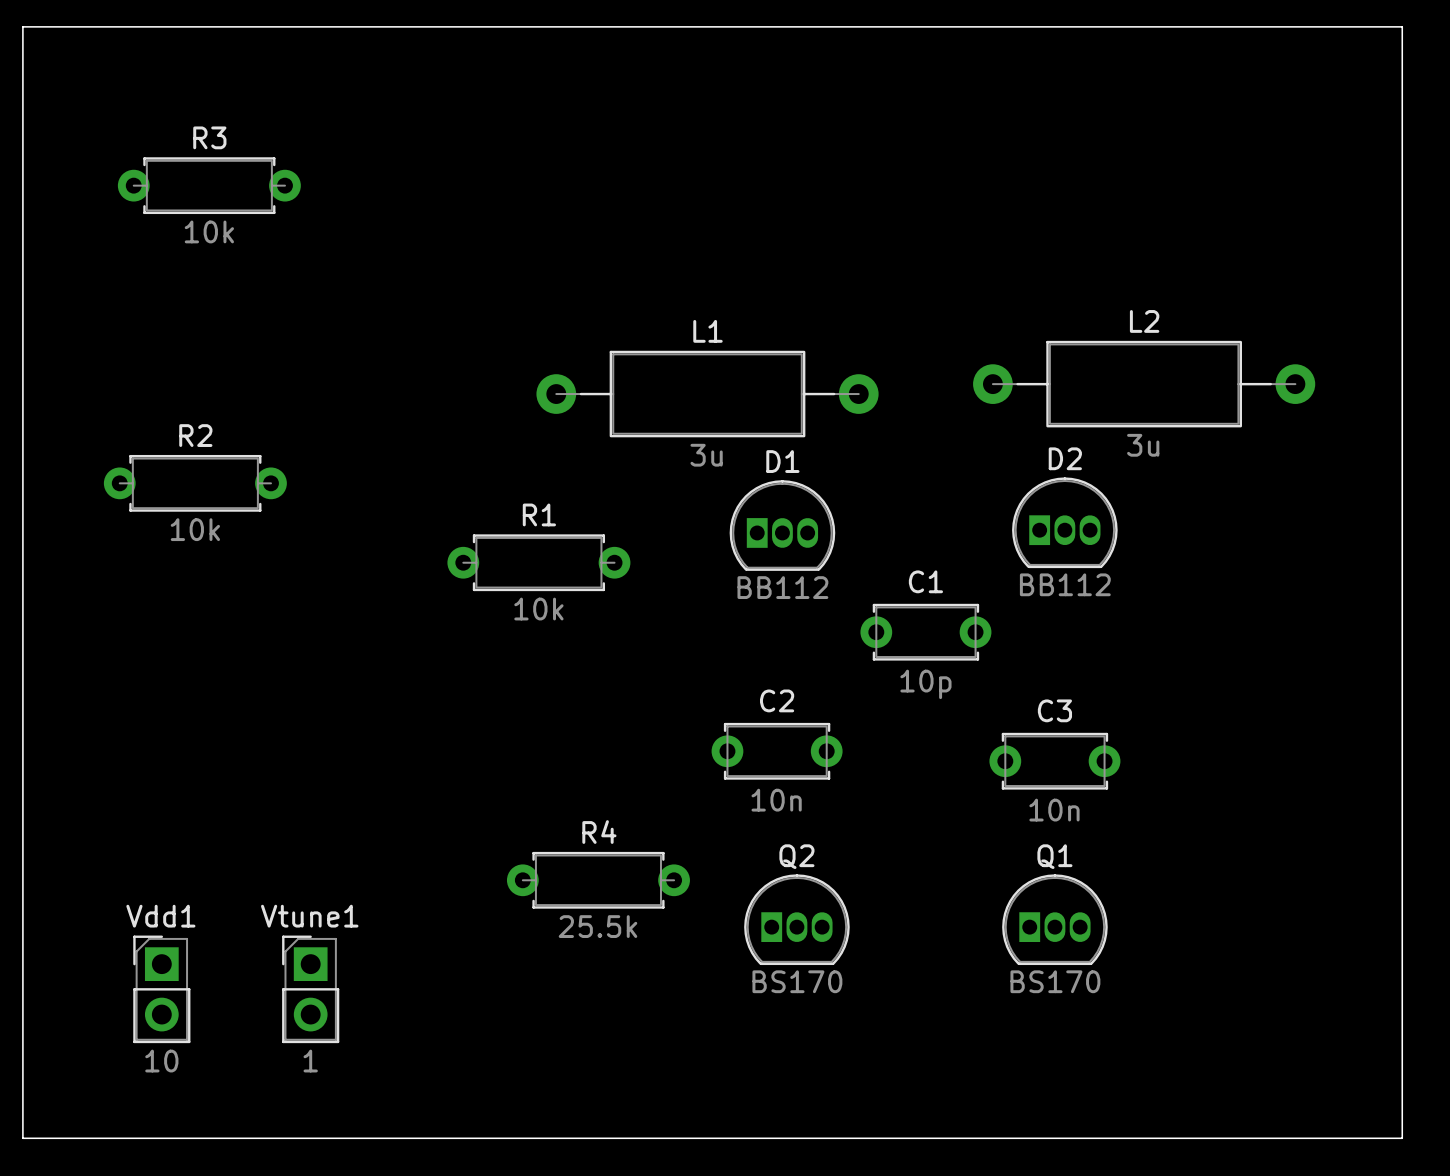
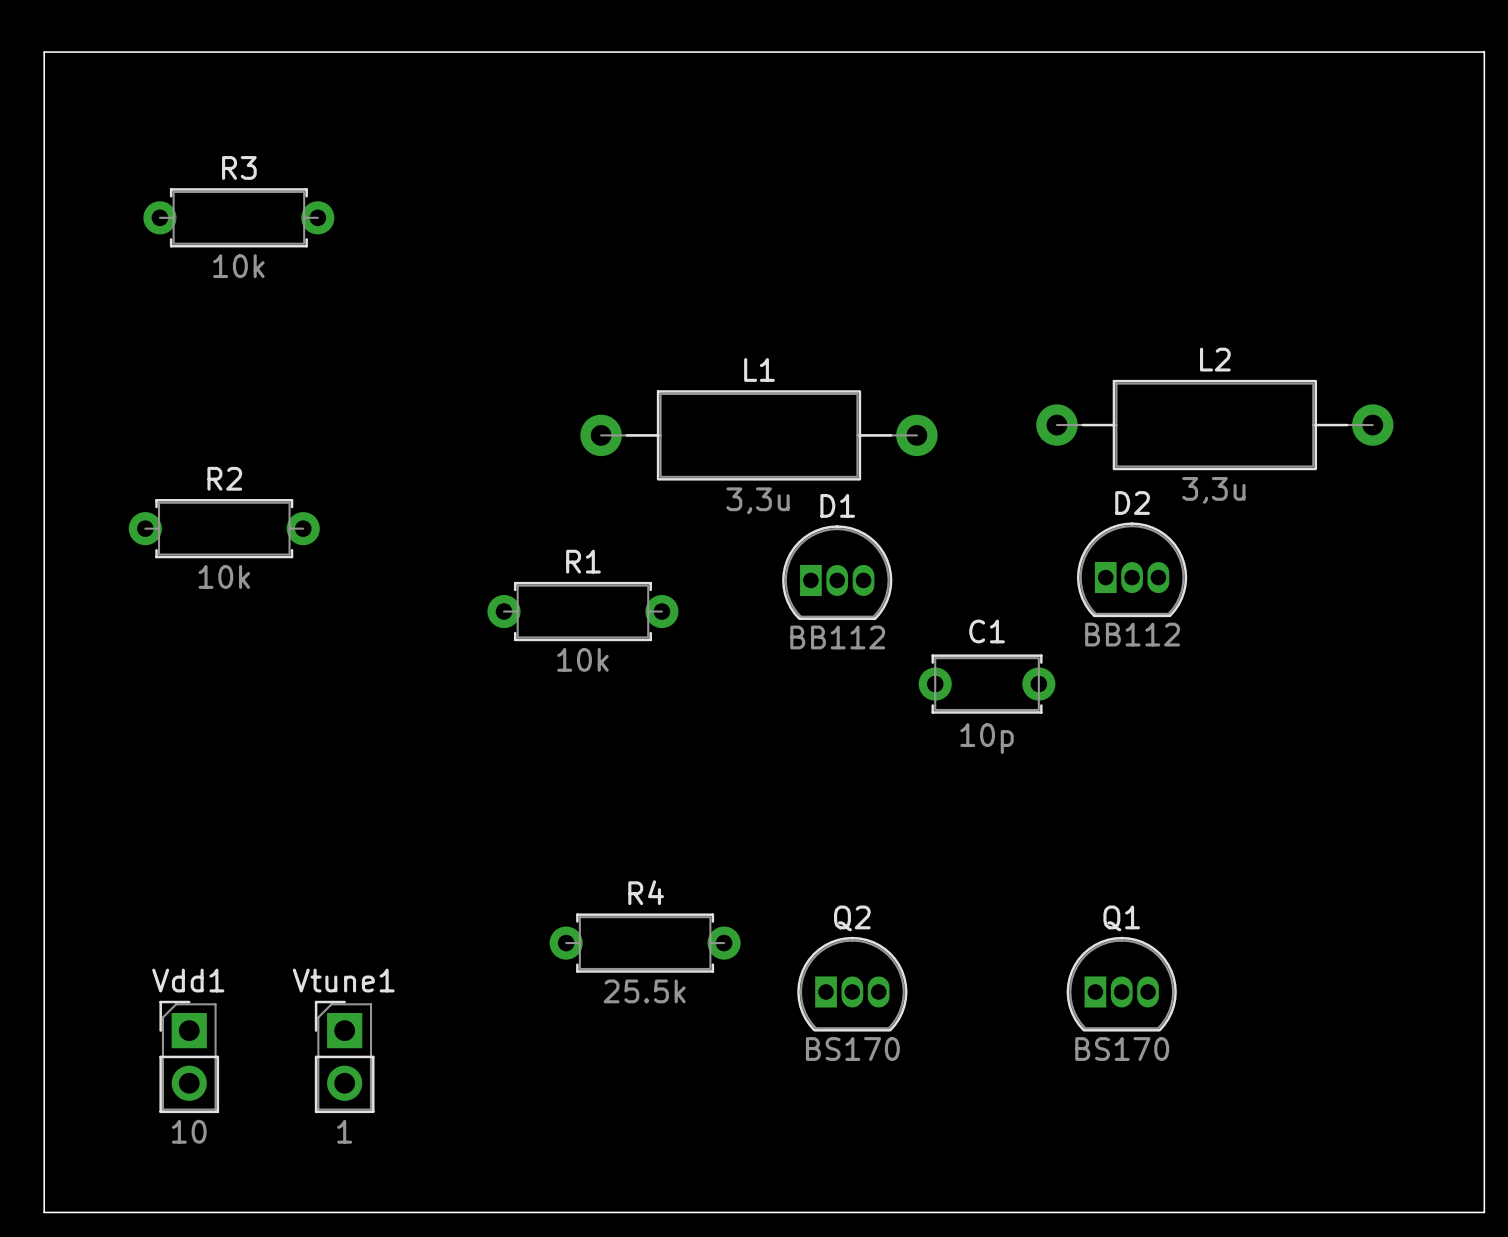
L2 value: 3u (1143, 445) -> 3,3u (1213, 490)
L1 value: 3u (706, 455) -> 3,3u (758, 500)
C2: 10n (777, 751) -> none
C3: 10n (1054, 761) -> none

